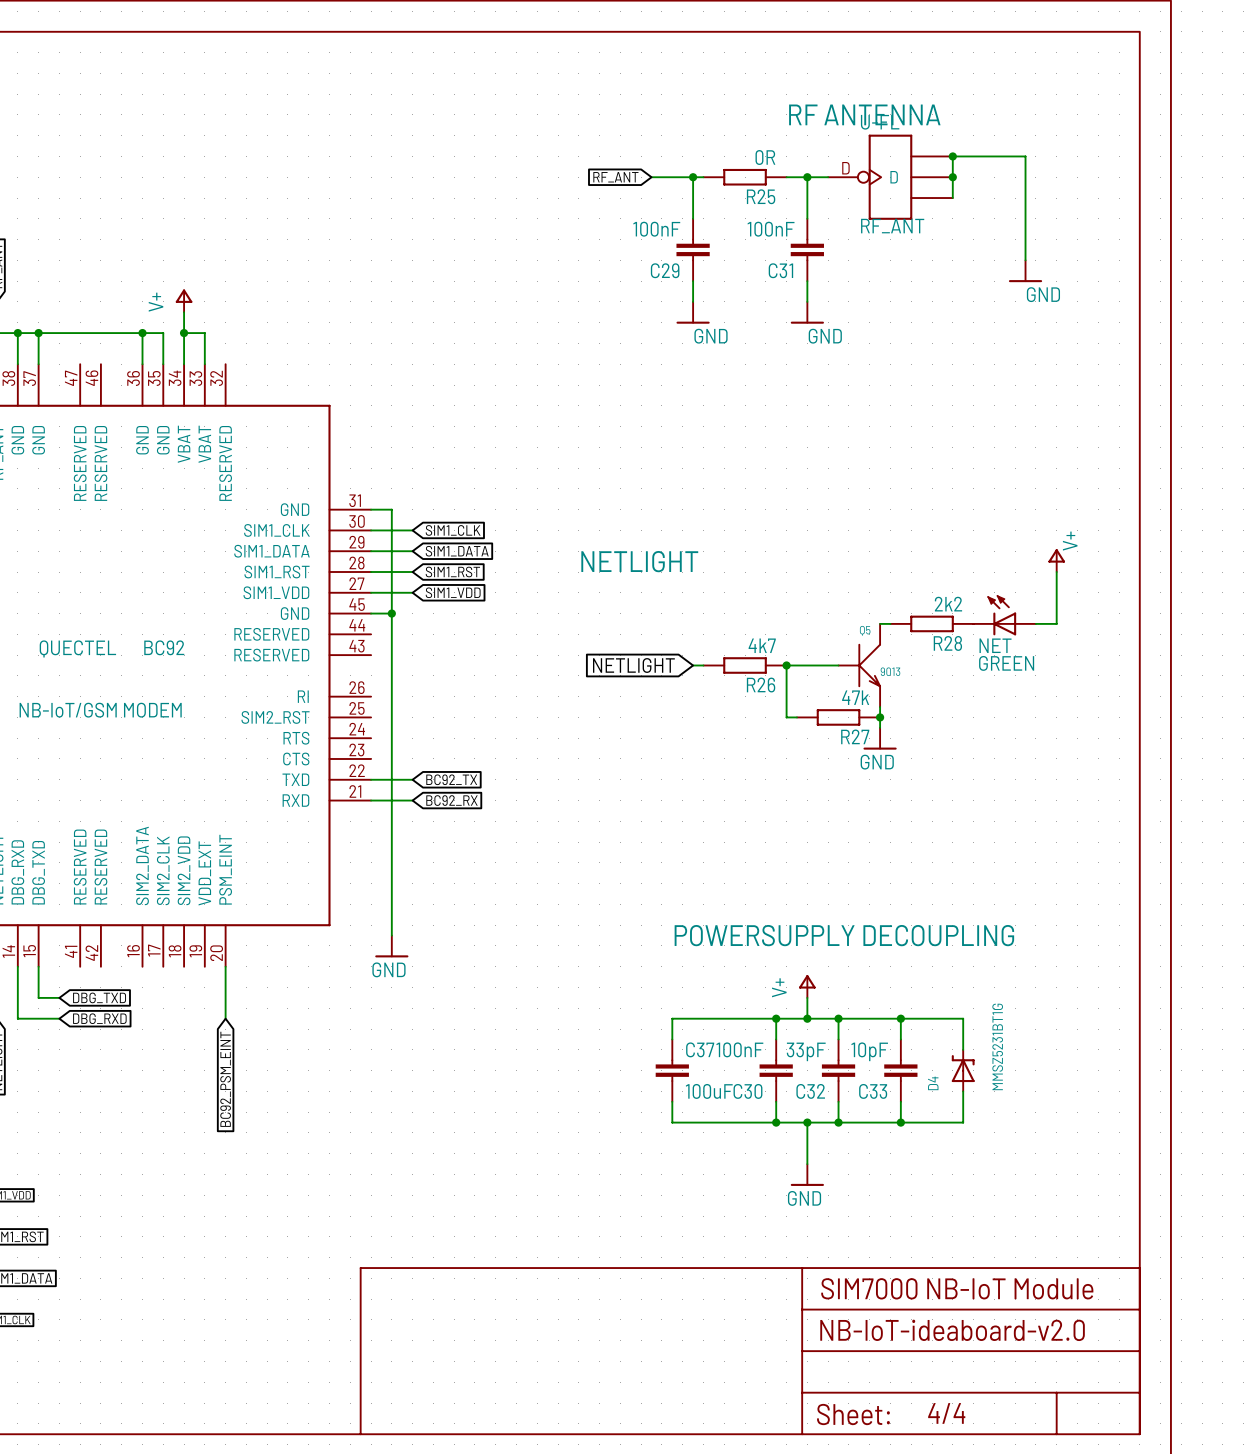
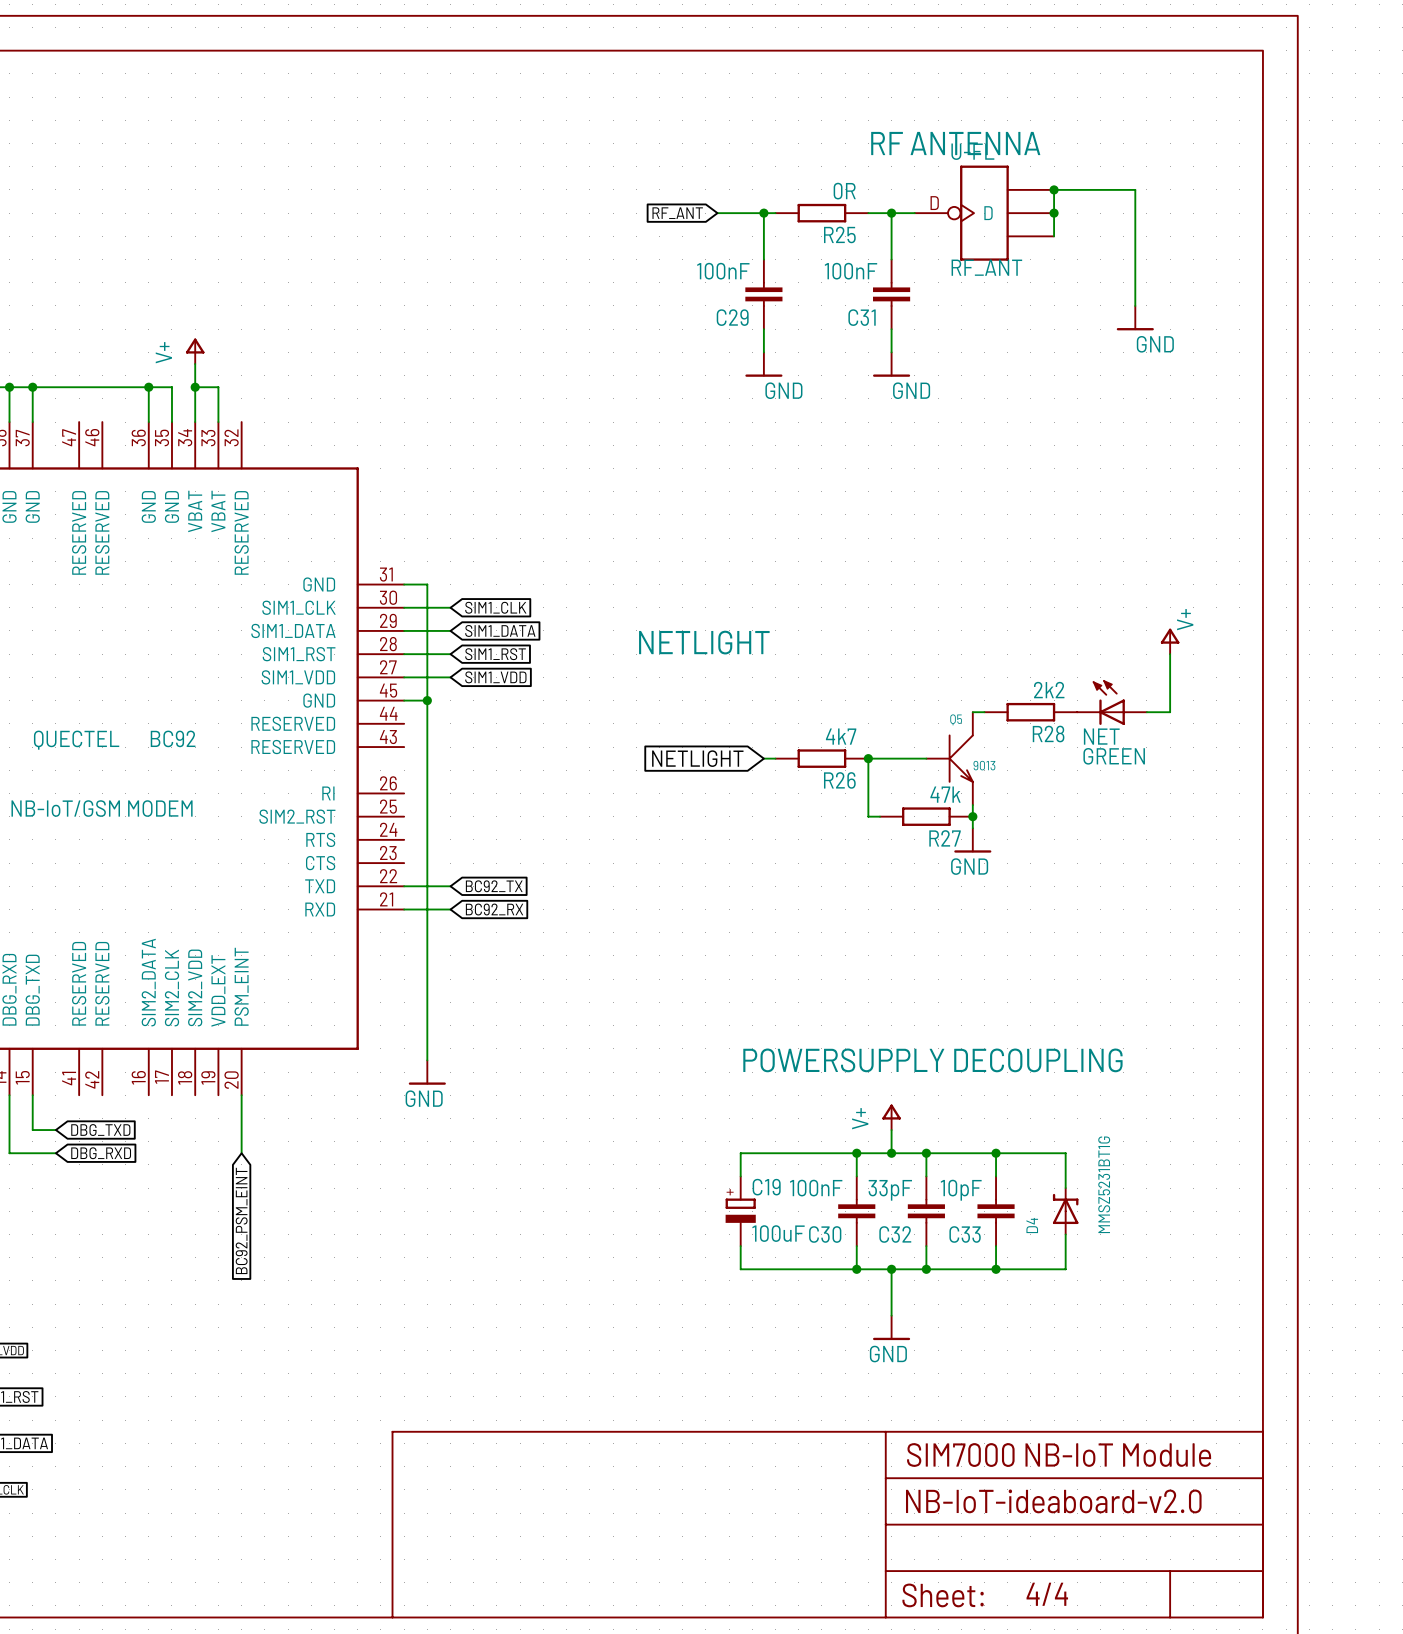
C37: 100uF (672, 1070) -> none
C19: none -> 100uF (740, 1211)

